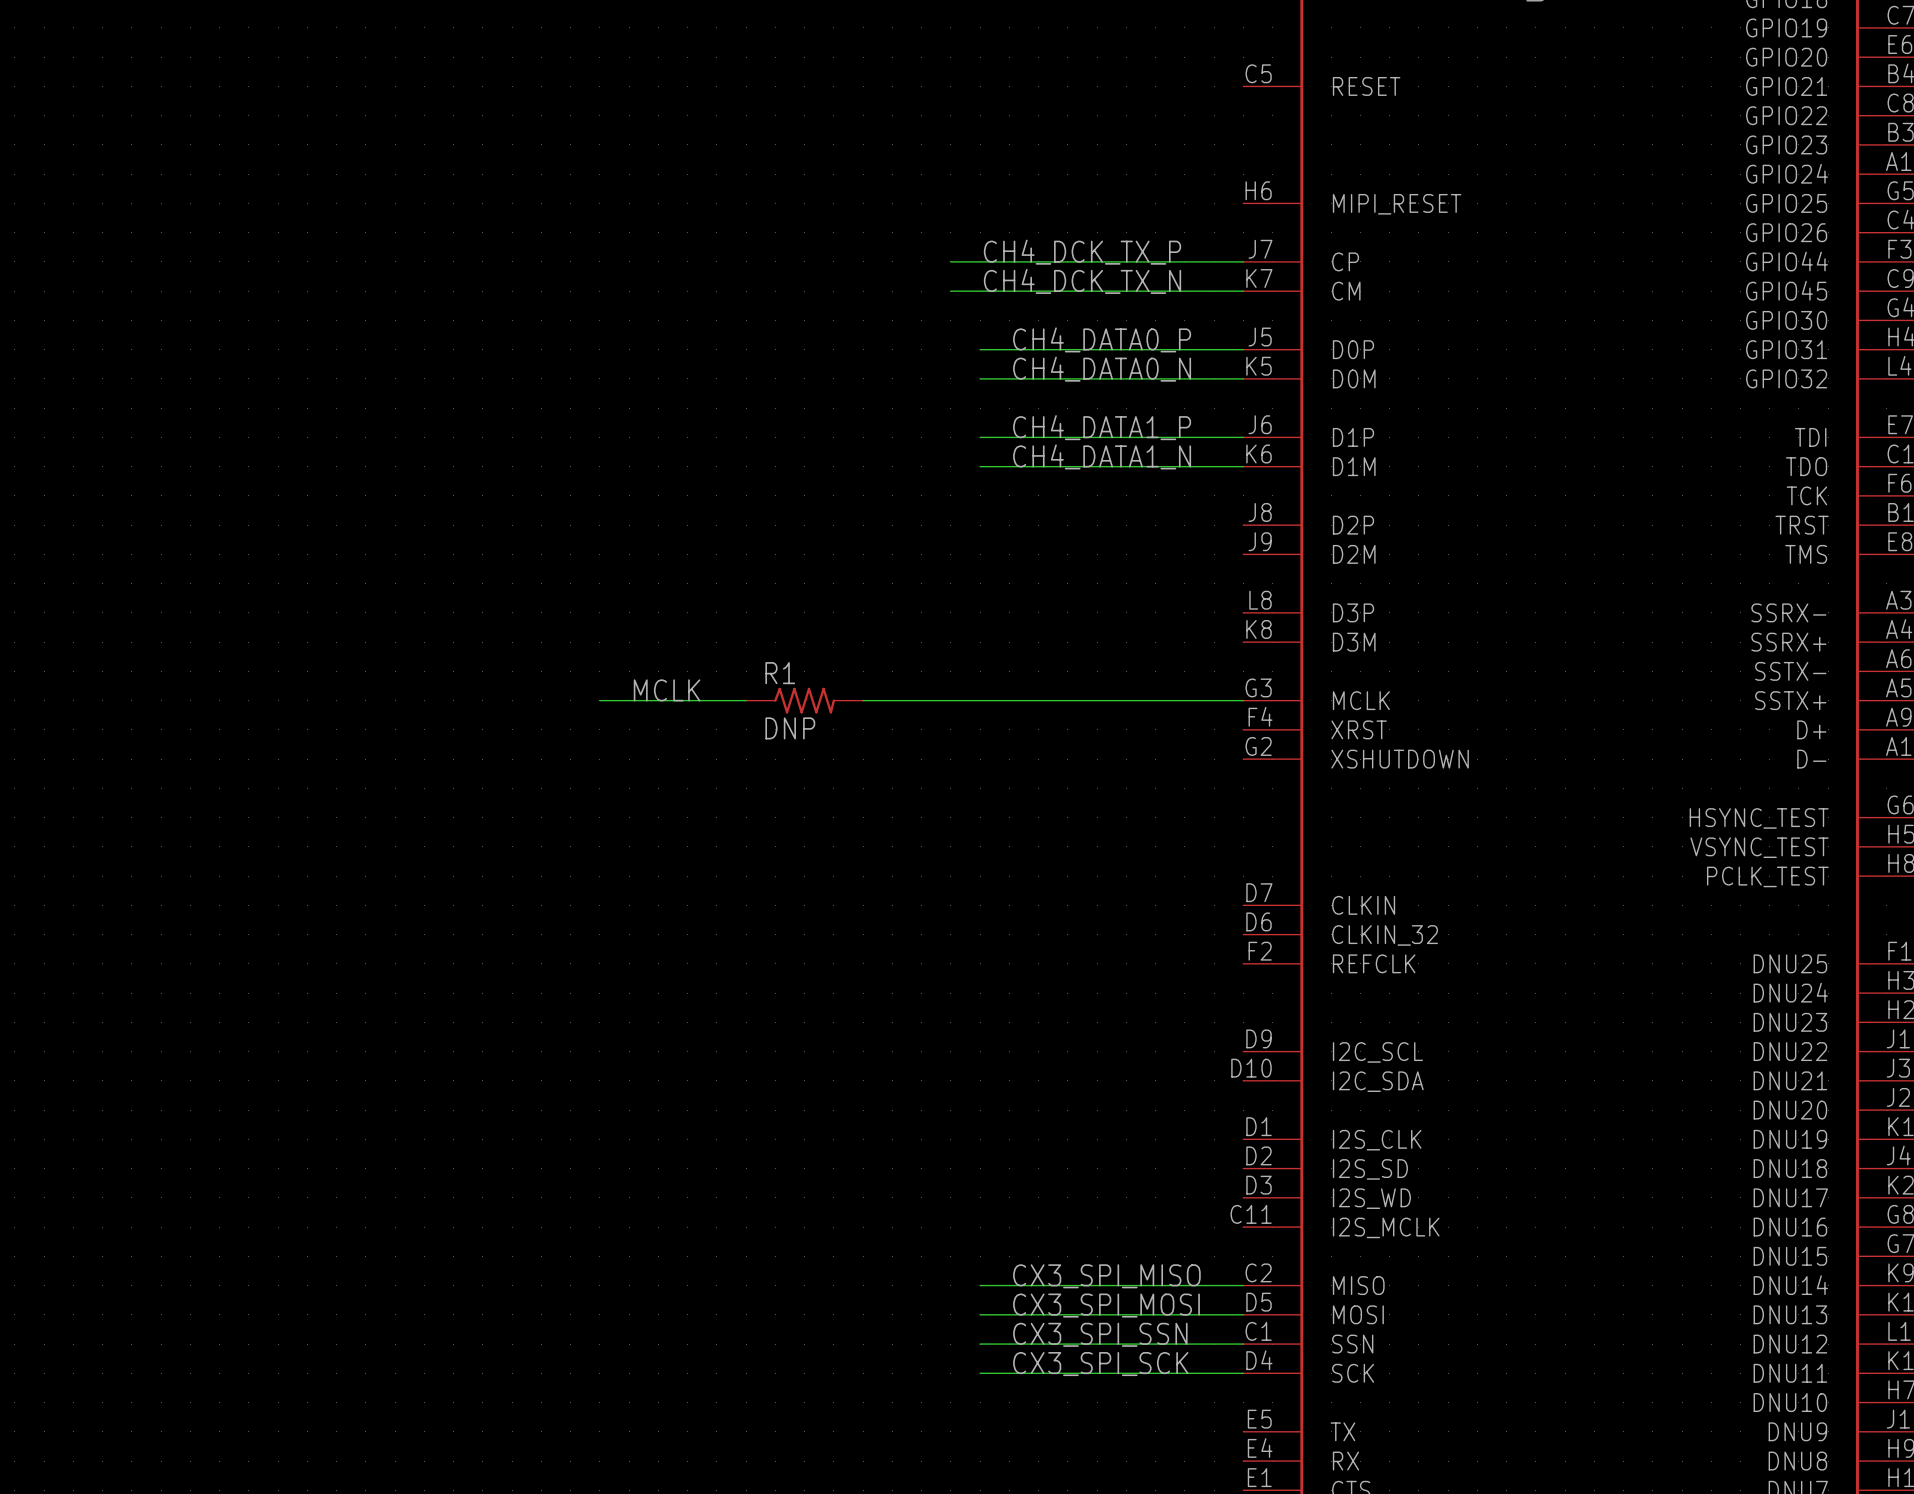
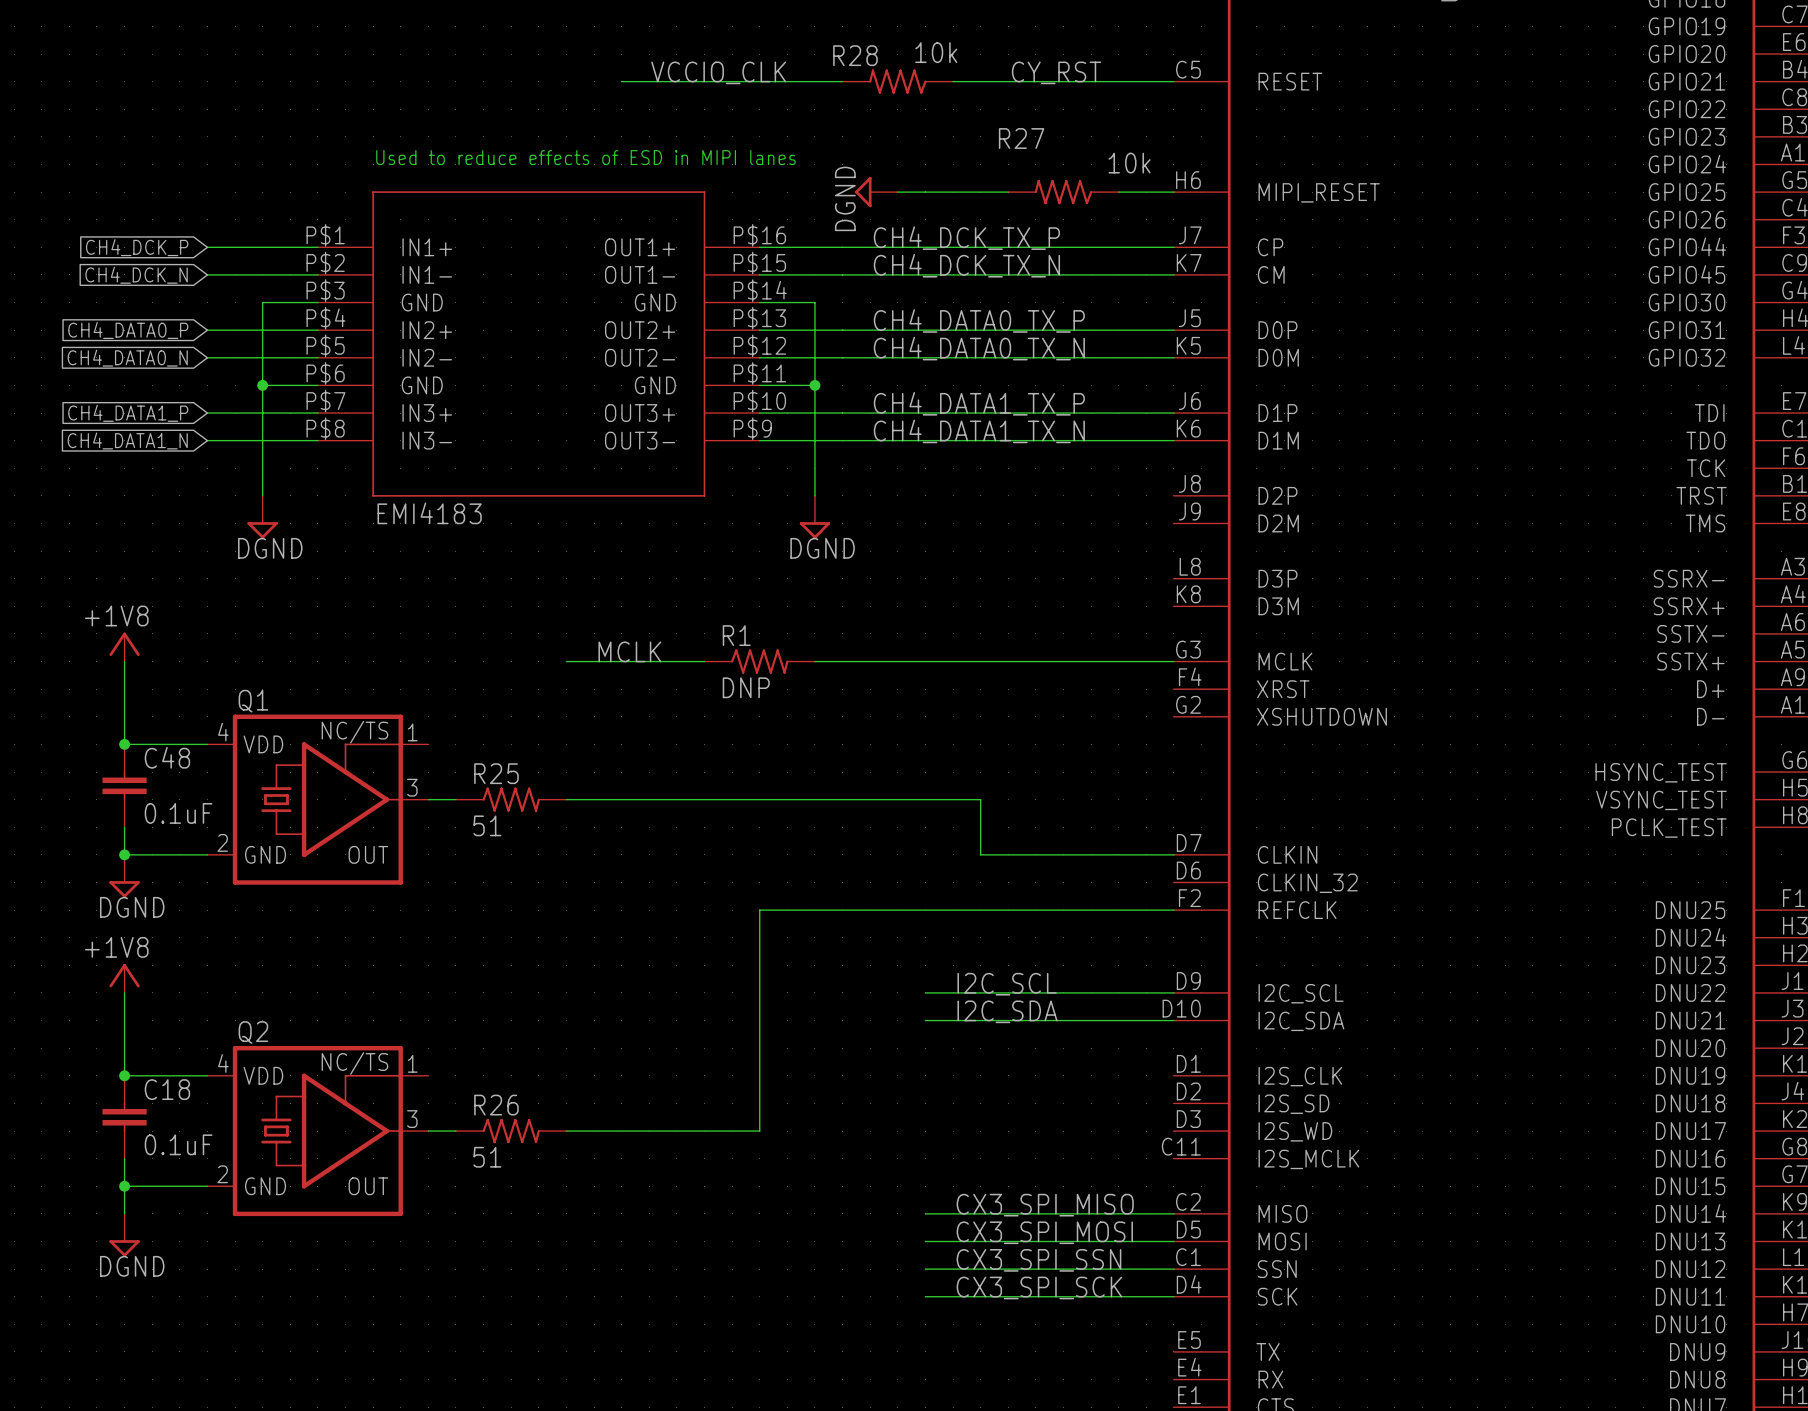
label: none -> VCCIO_CLK (718, 72)
label: none -> CY_RST (1056, 72)
wire: none -> (621, 81) (842, 81)
R28: none -> 10k (897, 81)
wire: none -> (953, 81) (1173, 81)
text: none -> Used to reduce effects of ESD in MIPI lanes (585, 157)
power symbol: none -> DGND (876, 192)
wire: none -> (897, 192) (1008, 192)
R27: none -> 10k (1063, 192)
wire: none -> (1118, 192) (1173, 192)
label position: CH4_DCK_TX_P (1082, 252) -> CH4_DCK_TX_P (966, 238)
wire: none -> (207, 247) (317, 247)
wire: none -> (759, 247) (897, 247)
global label: none -> CH4_DCK_P (137, 247)
label position: CH4_DCK_TX_N (1082, 281) -> CH4_DCK_TX_N (966, 265)
global label: none -> CH4_DCK_N (136, 275)
wire: none -> (207, 274) (317, 274)
wire: none -> (759, 274) (897, 274)
wire: none -> (317, 302) (262, 302) (262, 495)
wire: none -> (759, 302) (814, 302) (814, 495)
label: none -> CH4_DATA0_TX_P (979, 320)
label: CH4_DATA0_P (1102, 339) -> none
wire: none -> (207, 330) (317, 330)
wire: none -> (759, 330) (925, 330)
global label: none -> CH4_DATA0_P (128, 330)
EMI4183: none -> (538, 343)
label: none -> CH4_DATA0_TX_N (979, 348)
label: CH4_DATA0_N (1102, 369) -> none
wire: none -> (207, 357) (317, 357)
wire: none -> (759, 357) (925, 357)
global label: none -> CH4_DATA0_N (127, 358)
wire: none -> (262, 385) (317, 385)
junction: none -> (262, 385)
wire: none -> (759, 385) (814, 385)
junction: none -> (814, 385)
label: none -> CH4_DATA1_TX_P (979, 403)
label: CH4_DATA1_P (1102, 427) -> none
global label: none -> CH4_DATA1_P (128, 413)
wire: none -> (207, 413) (317, 413)
wire: none -> (759, 413) (925, 413)
label: none -> CH4_DATA1_TX_N (979, 431)
label: CH4_DATA1_N (1102, 456) -> none
wire: none -> (207, 440) (317, 440)
wire: none -> (759, 440) (925, 440)
global label: none -> CH4_DATA1_N (127, 440)
power symbol: none -> DGND (262, 517)
power symbol: none -> DGND (814, 517)
power symbol: none -> +1V8 (124, 647)
wire: none -> (124, 661) (124, 744) (207, 744)
junction: none -> (124, 744)
C48: none -> 0.1uF (124, 785)
Q1: none -> (317, 799)
wire: none -> (428, 799) (455, 799)
R25: none -> 51 (511, 799)
wire: none -> (566, 799) (980, 799) (980, 854) (1173, 854)
wire: none -> (124, 827) (124, 854) (207, 854)
junction: none -> (124, 854)
power symbol: none -> DGND (124, 876)
wire: none -> (1173, 910) (759, 910) (759, 1131) (566, 1131)
power symbol: none -> +1V8 (124, 978)
label: none -> I2C_SCL (1007, 984)
wire: none -> (124, 992) (124, 1075) (207, 1075)
wire: none -> (925, 992) (1173, 992)
label: none -> I2C_SDA (1007, 1011)
wire: none -> (925, 1020) (1173, 1020)
junction: none -> (124, 1075)
C18: none -> 0.1uF (124, 1117)
Q2: none -> (317, 1131)
wire: none -> (428, 1131) (455, 1131)
R26: none -> 51 (511, 1131)
wire: none -> (124, 1158) (124, 1213)
wire: none -> (124, 1186) (207, 1186)
junction: none -> (124, 1186)
power symbol: none -> DGND (124, 1235)

